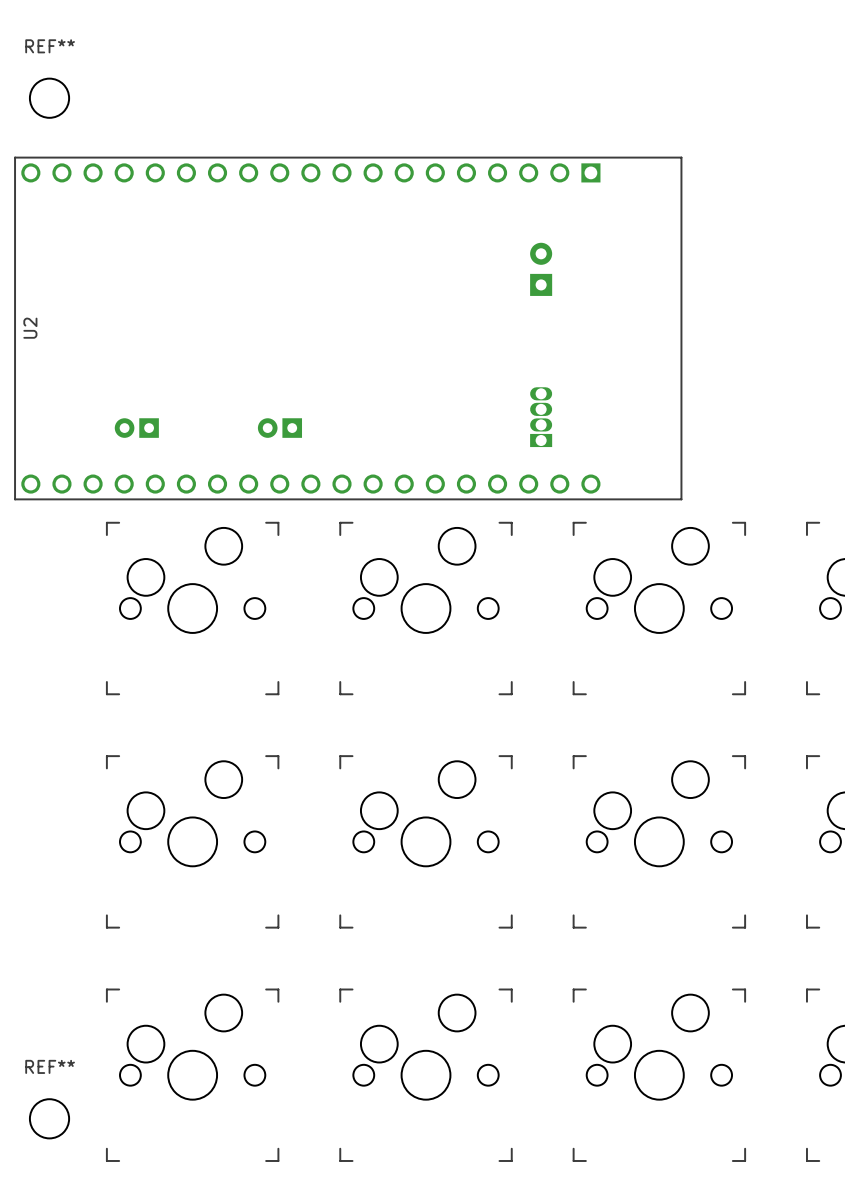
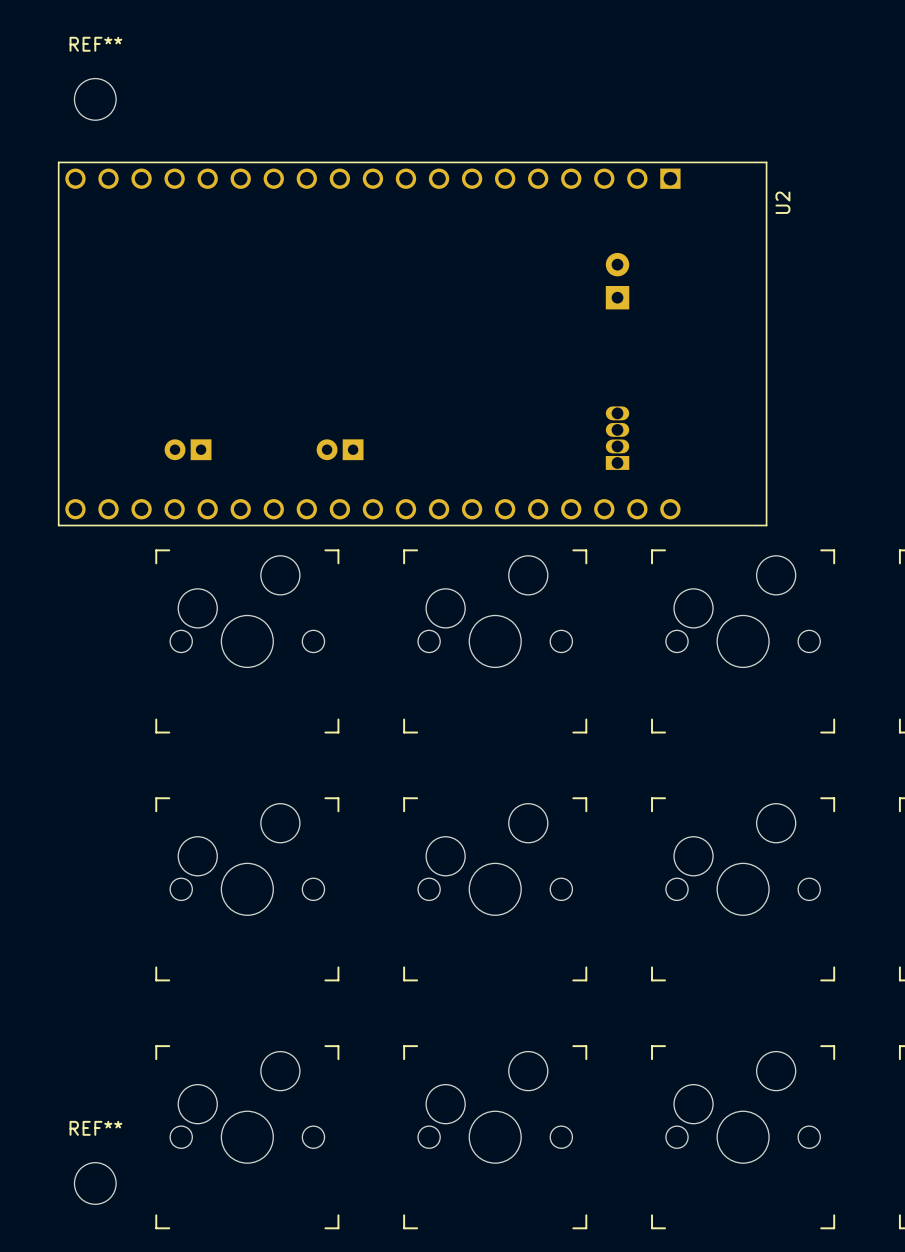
U2 name position: U2 (30, 328) -> U2 (782, 202)

